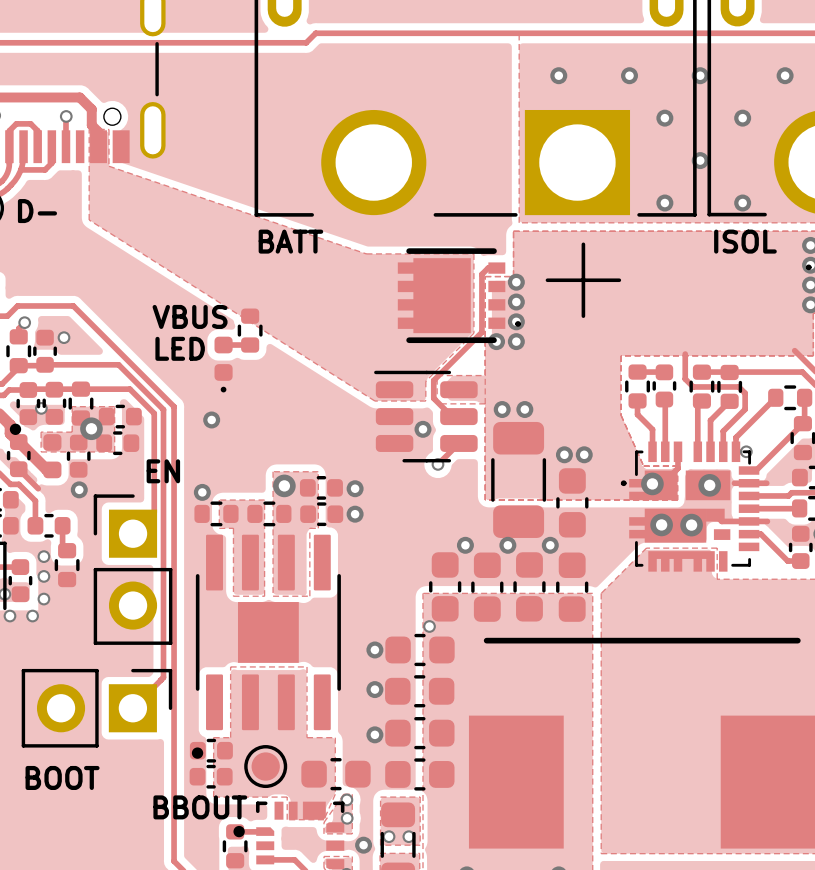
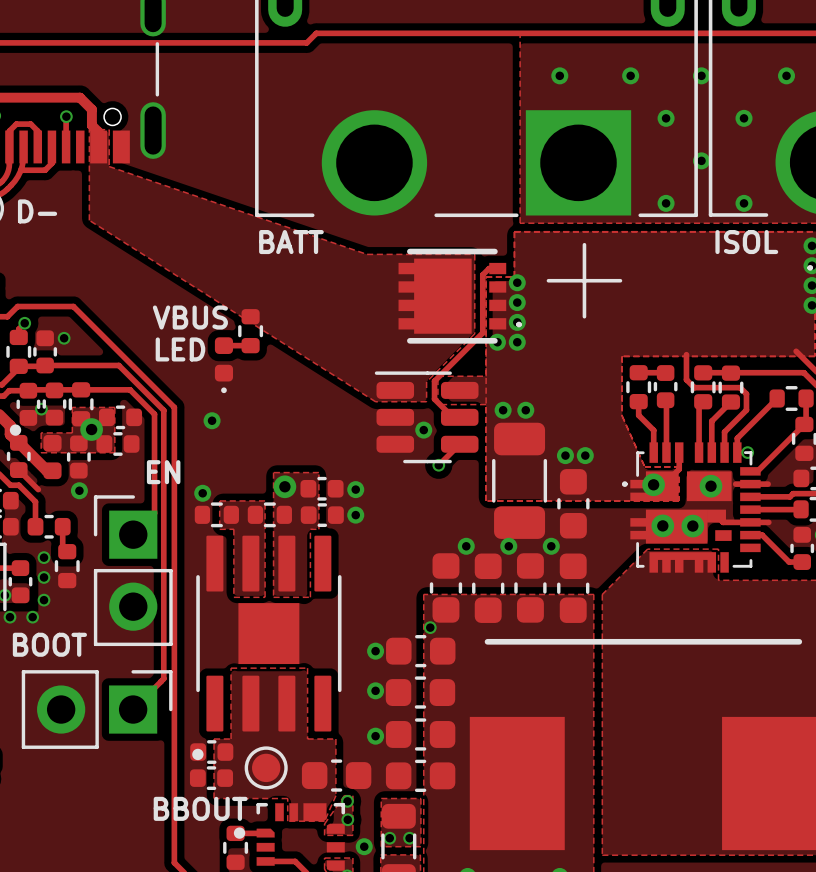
text position: BOOT (62, 777) -> BOOT (49, 644)

